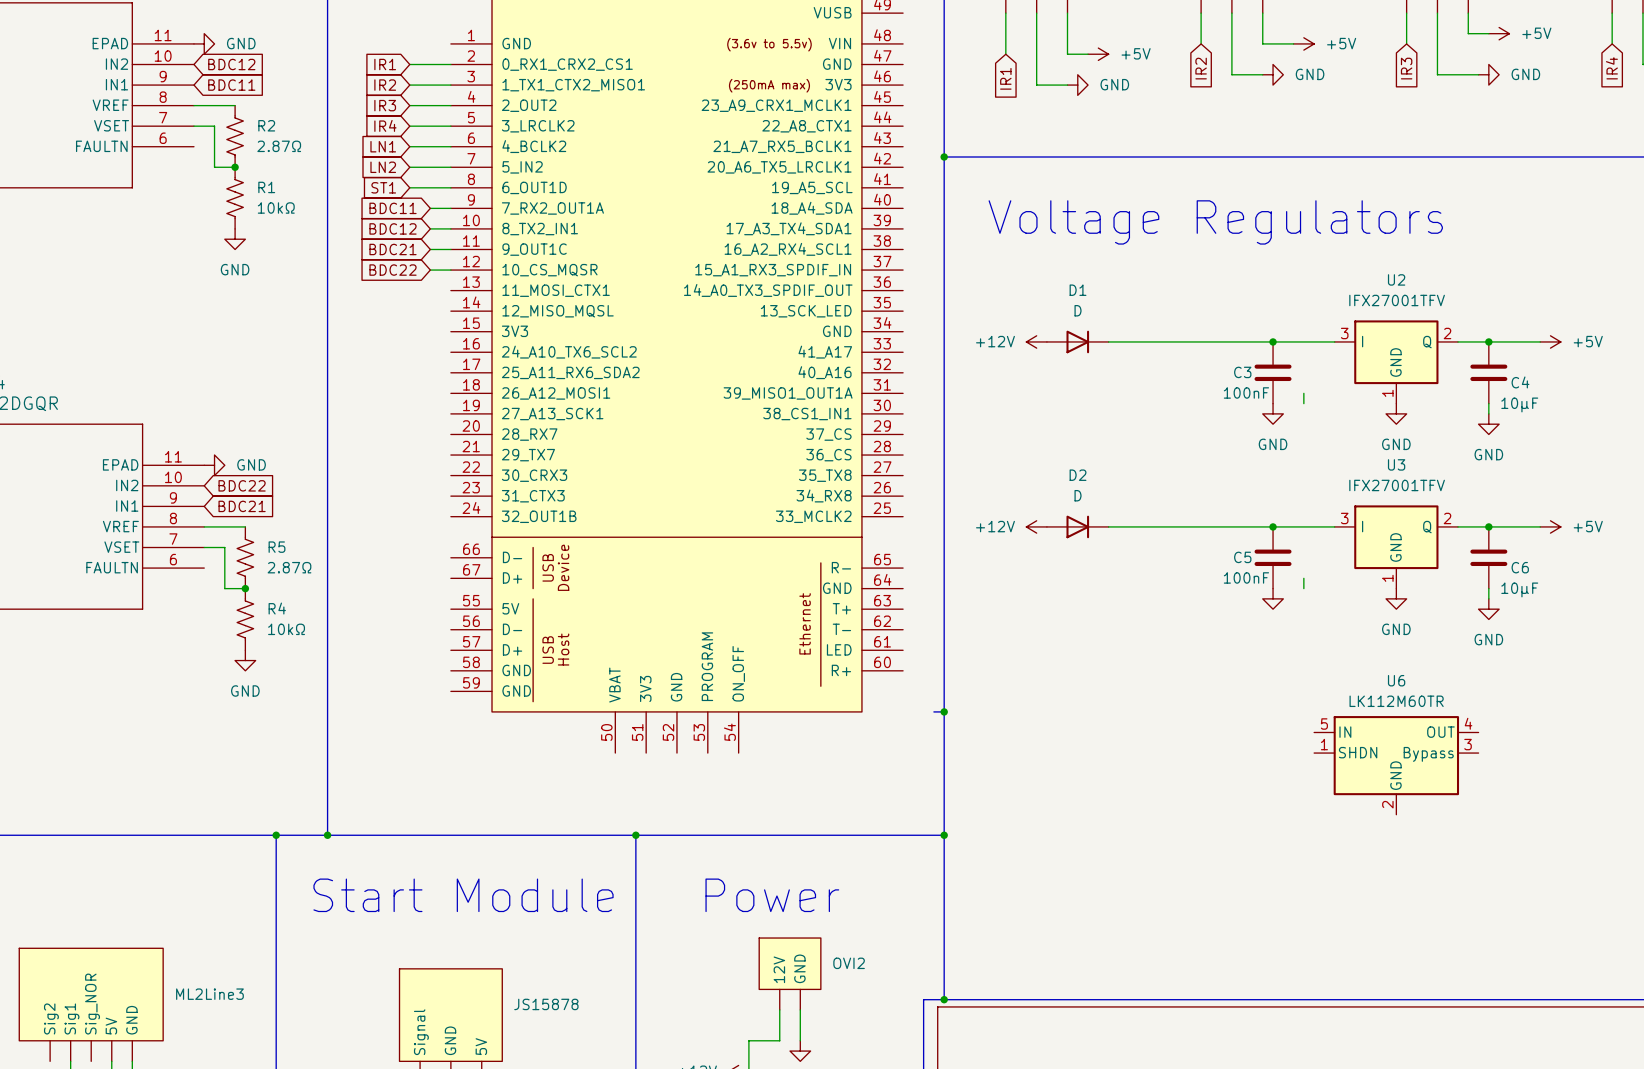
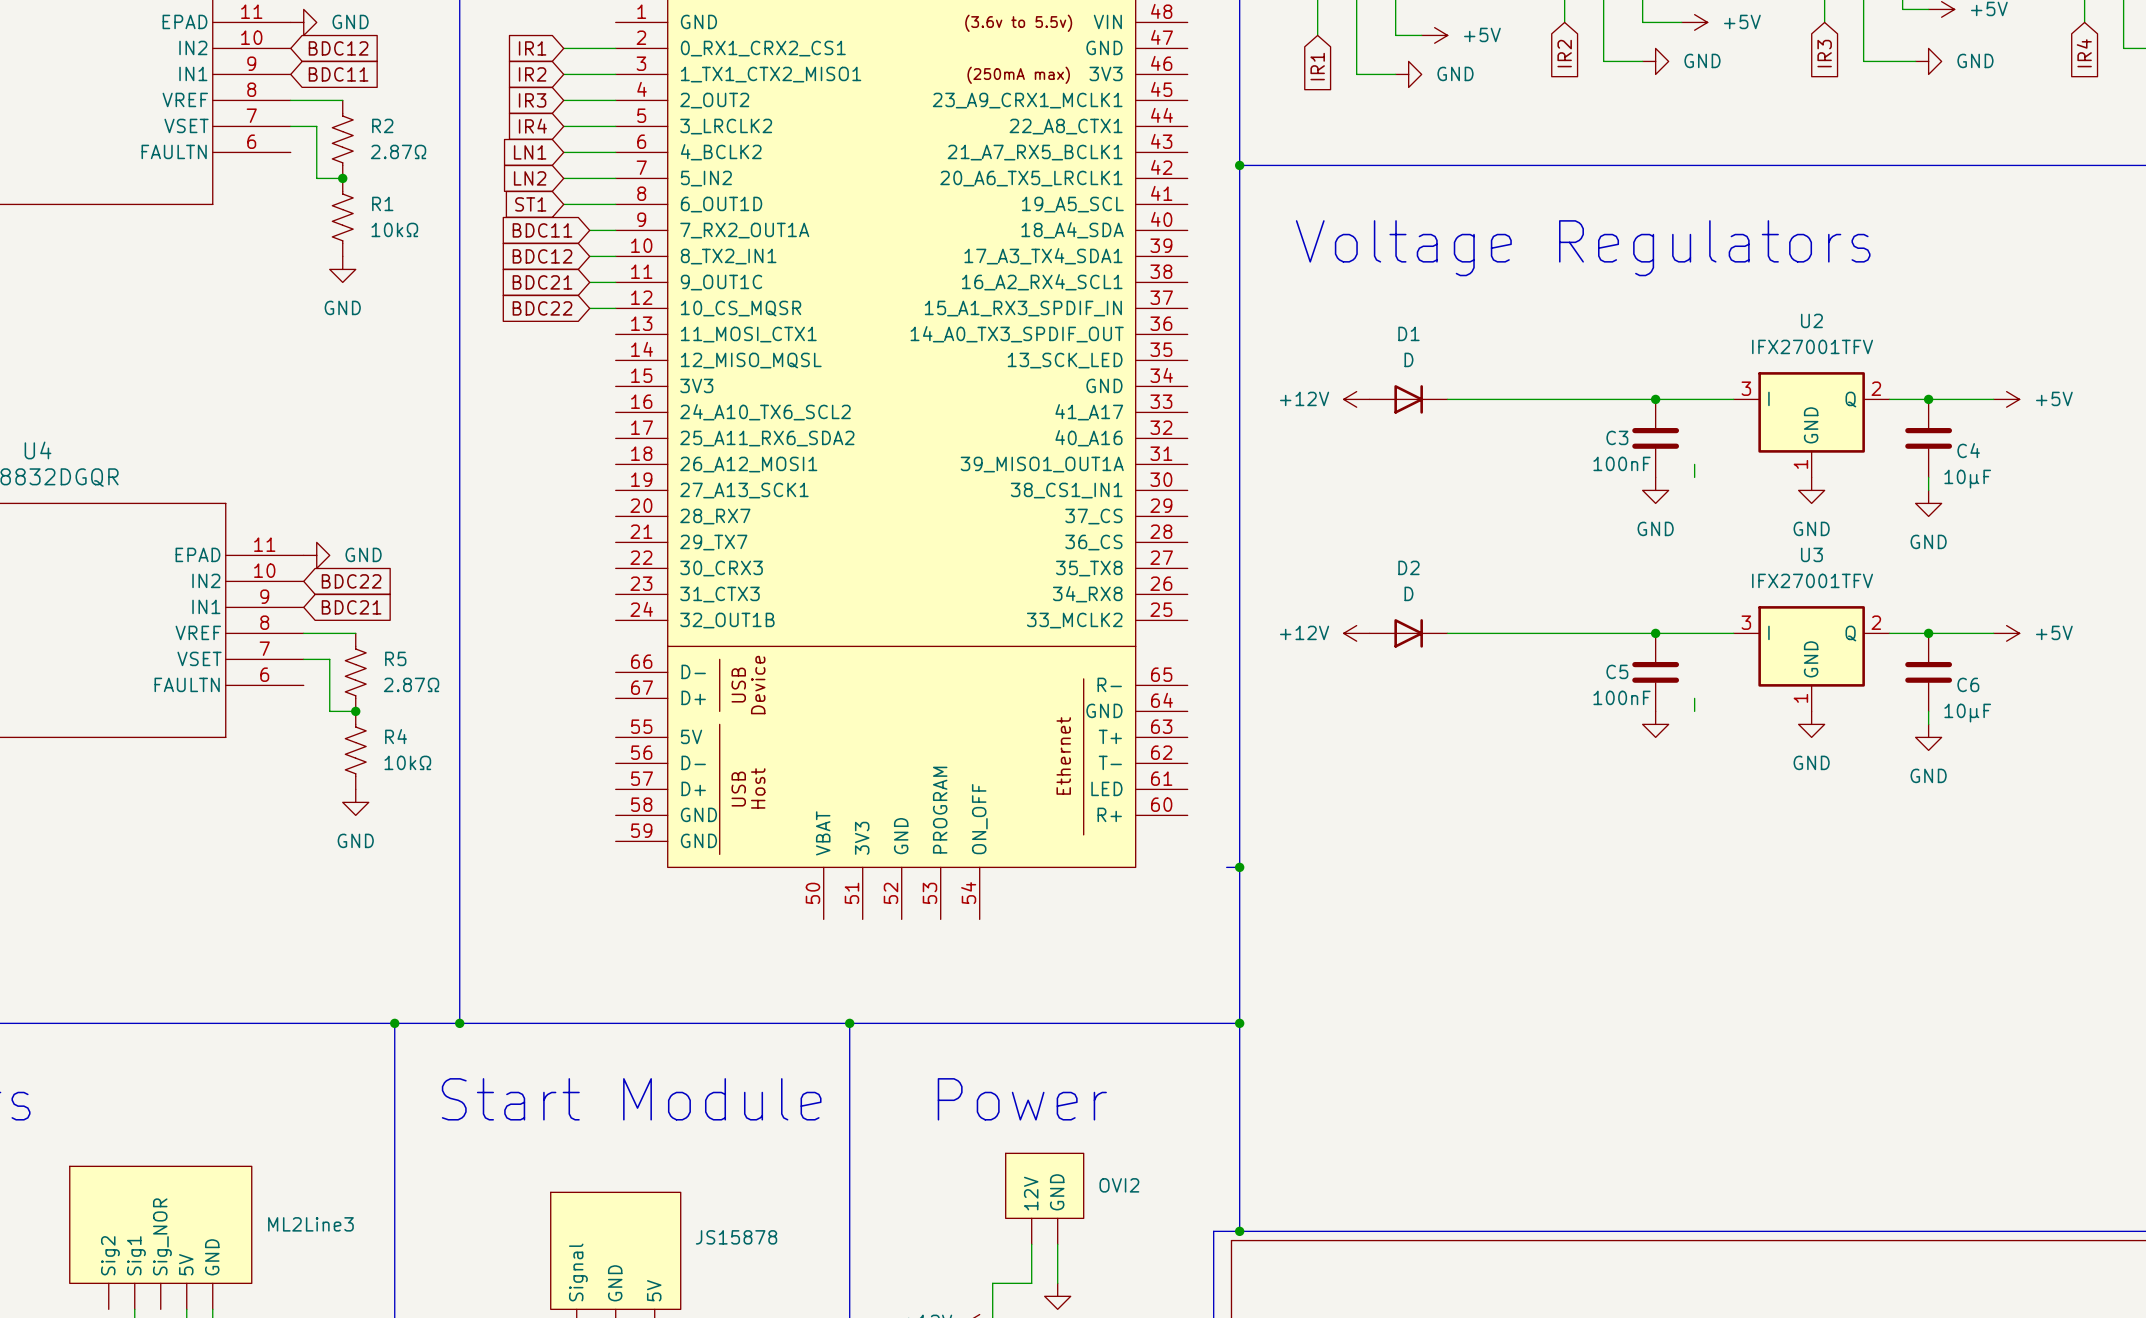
U6: LK112M60TR (1396, 765) -> none

